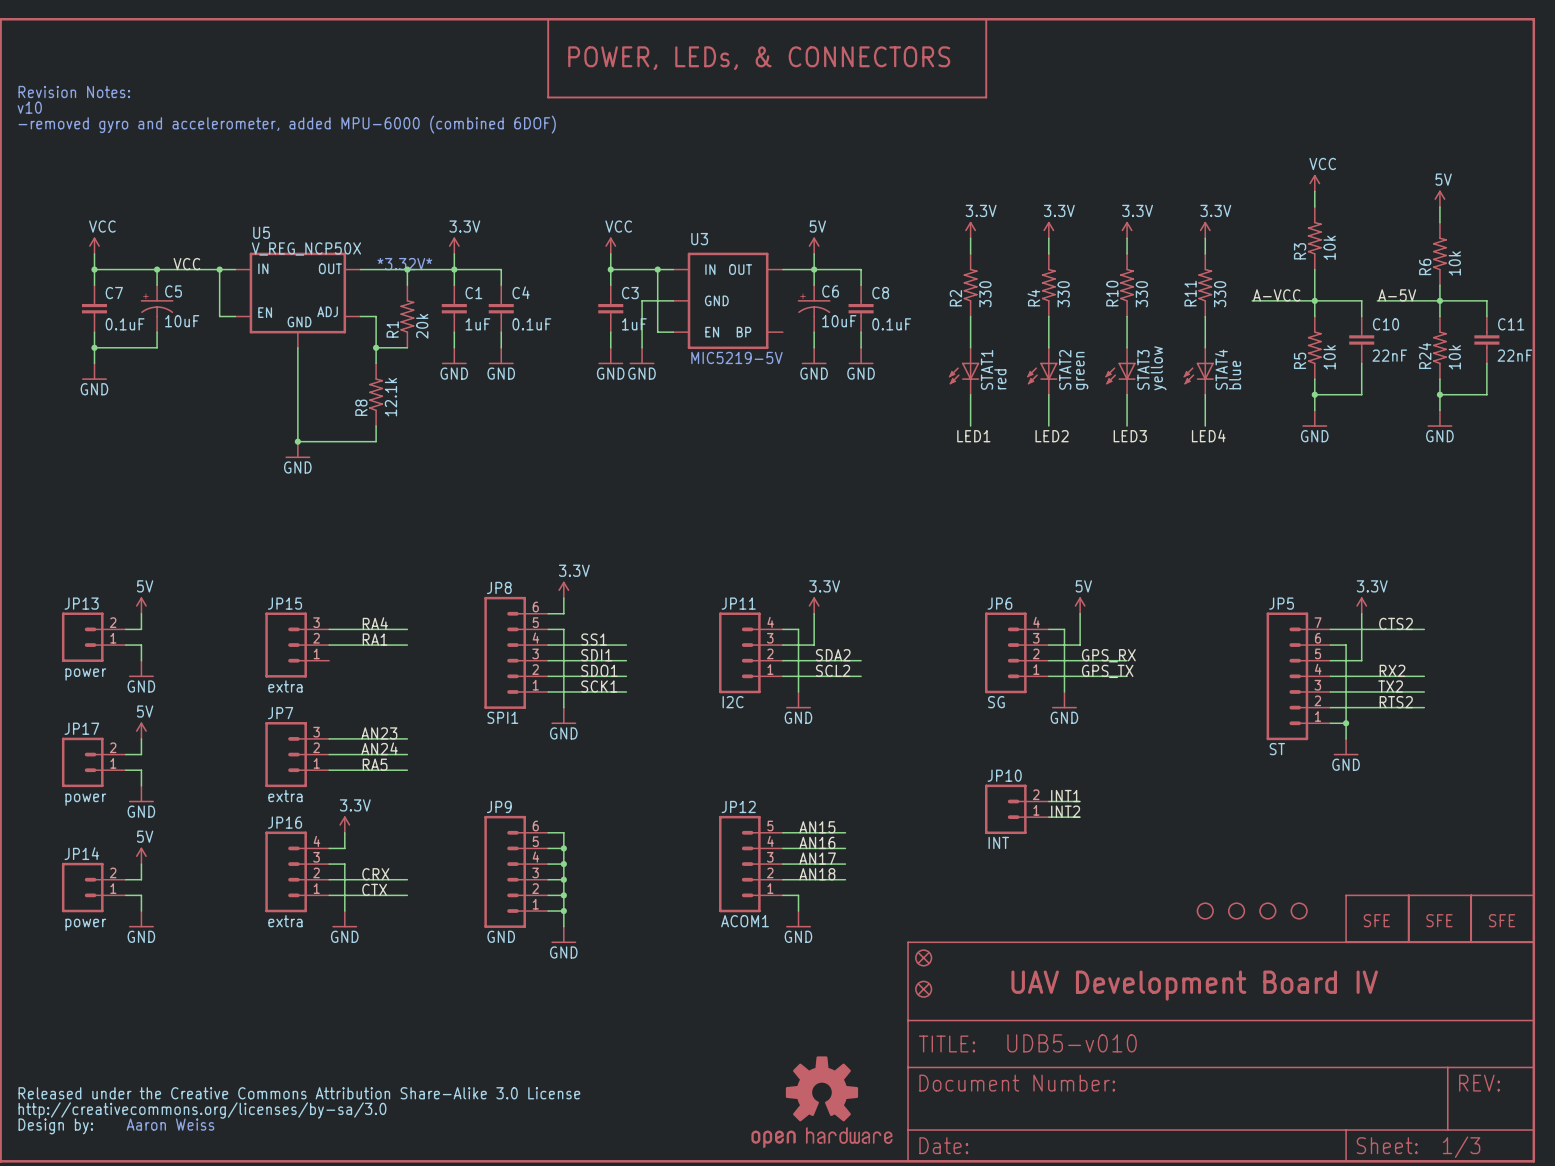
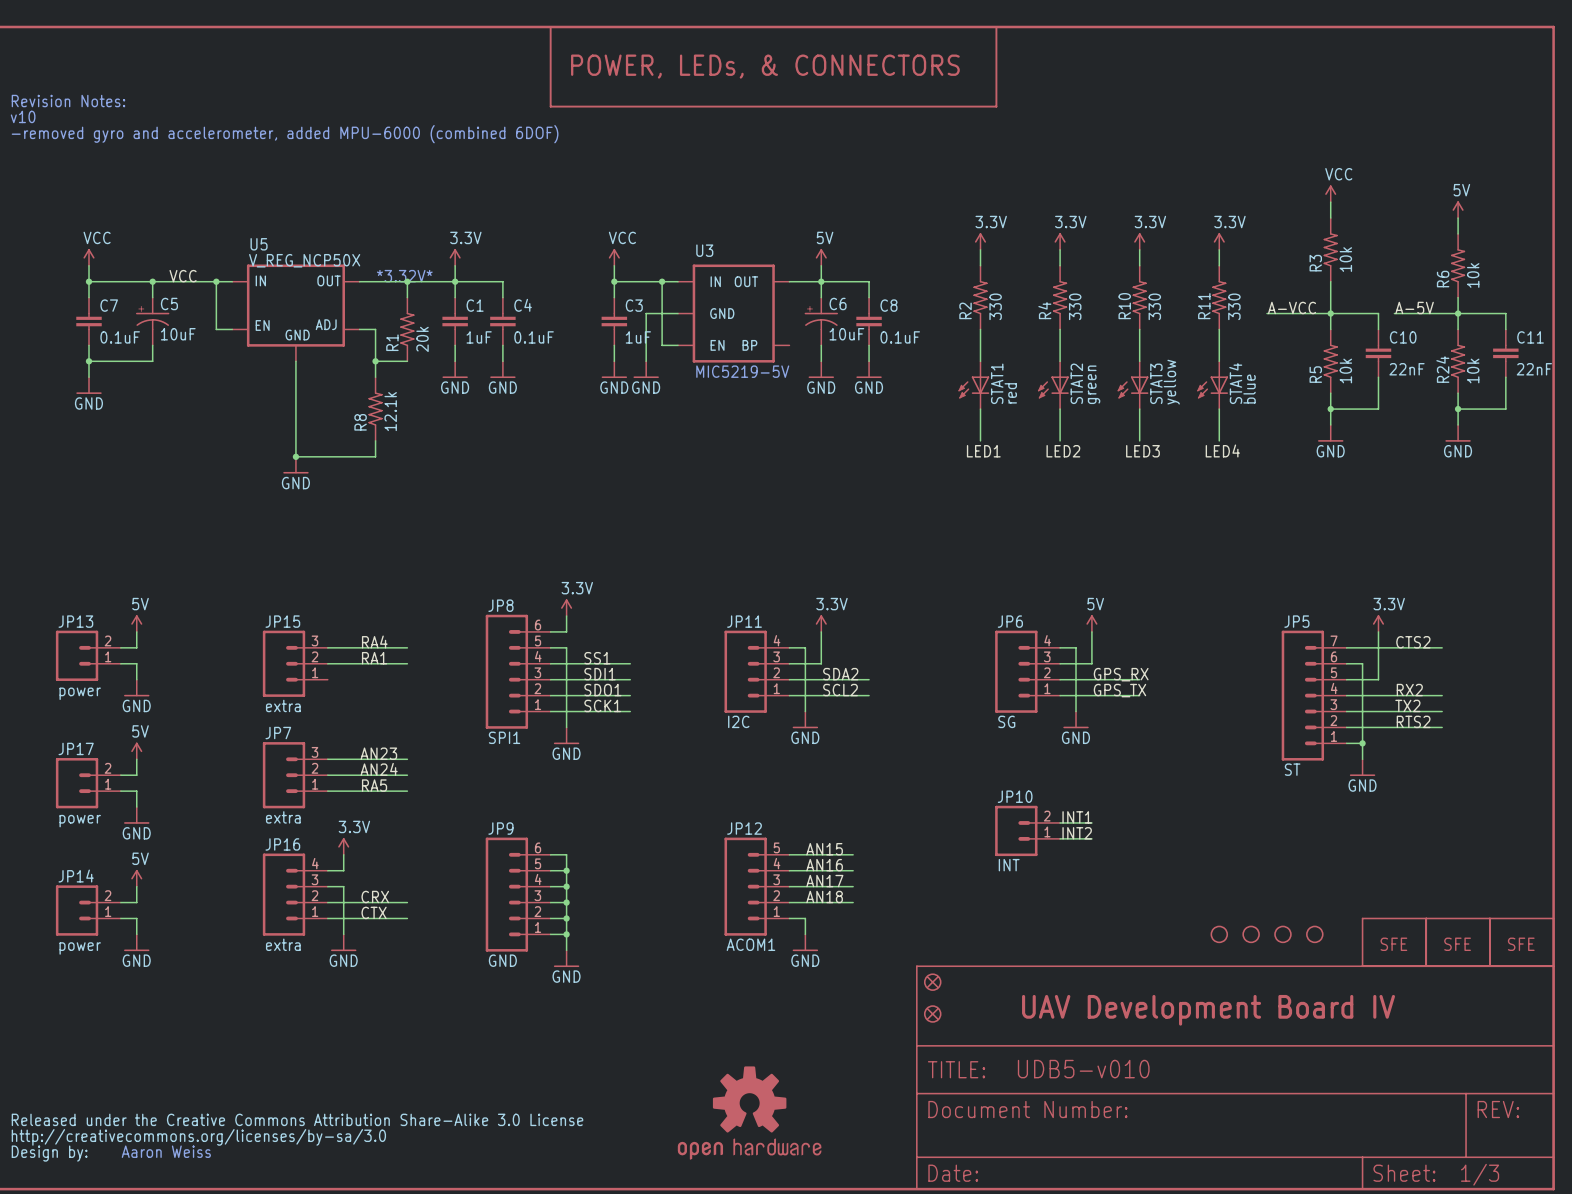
part position: (821, 1102) -> (749, 1113)

